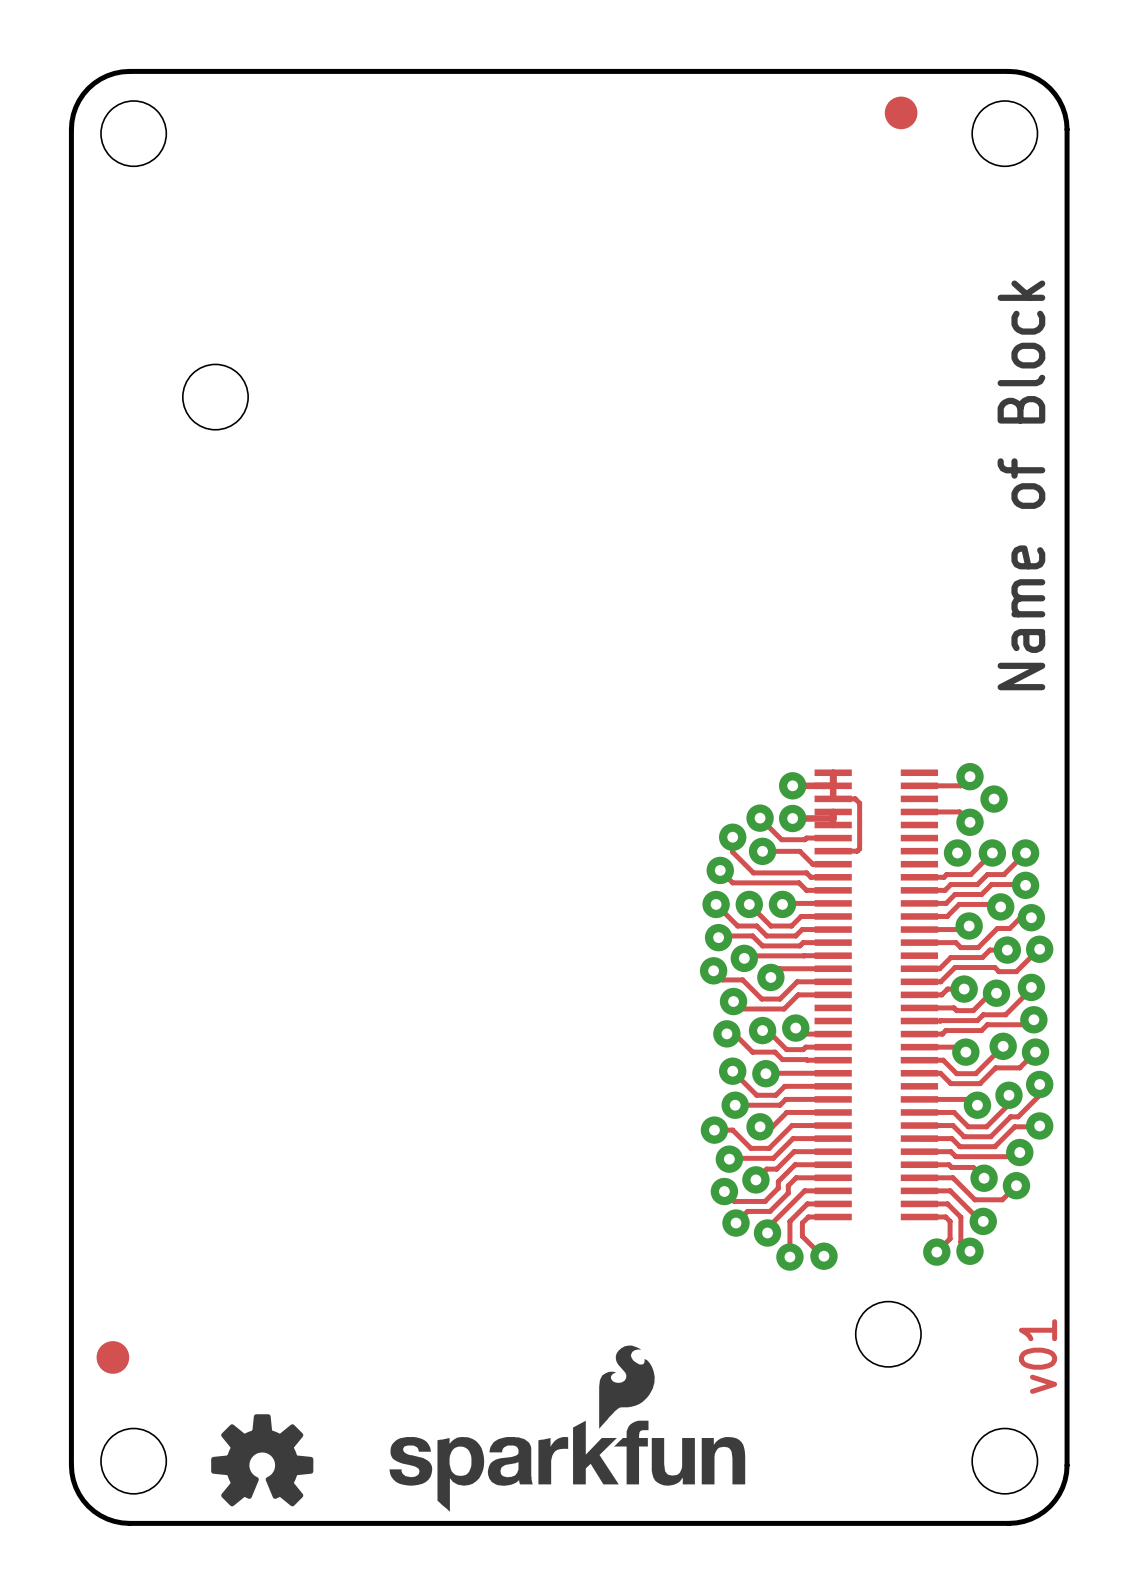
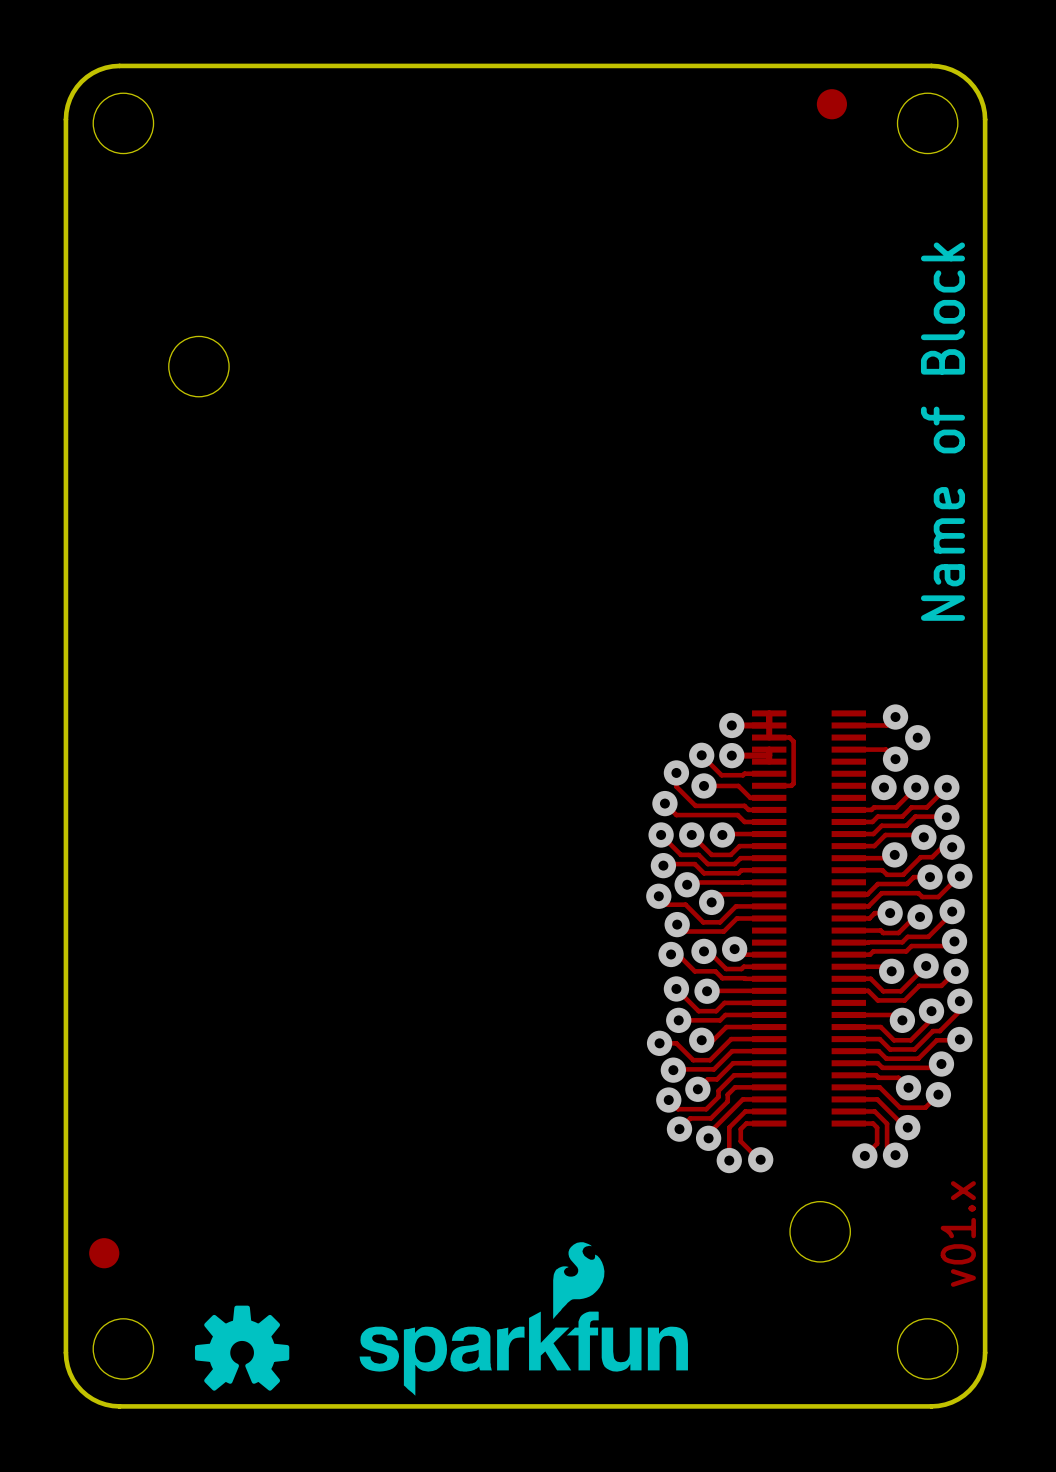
text position: Name of Block (1021, 485) -> Name of Block (942, 431)
text: v01 (1038, 1356) -> v01.x (958, 1234)

